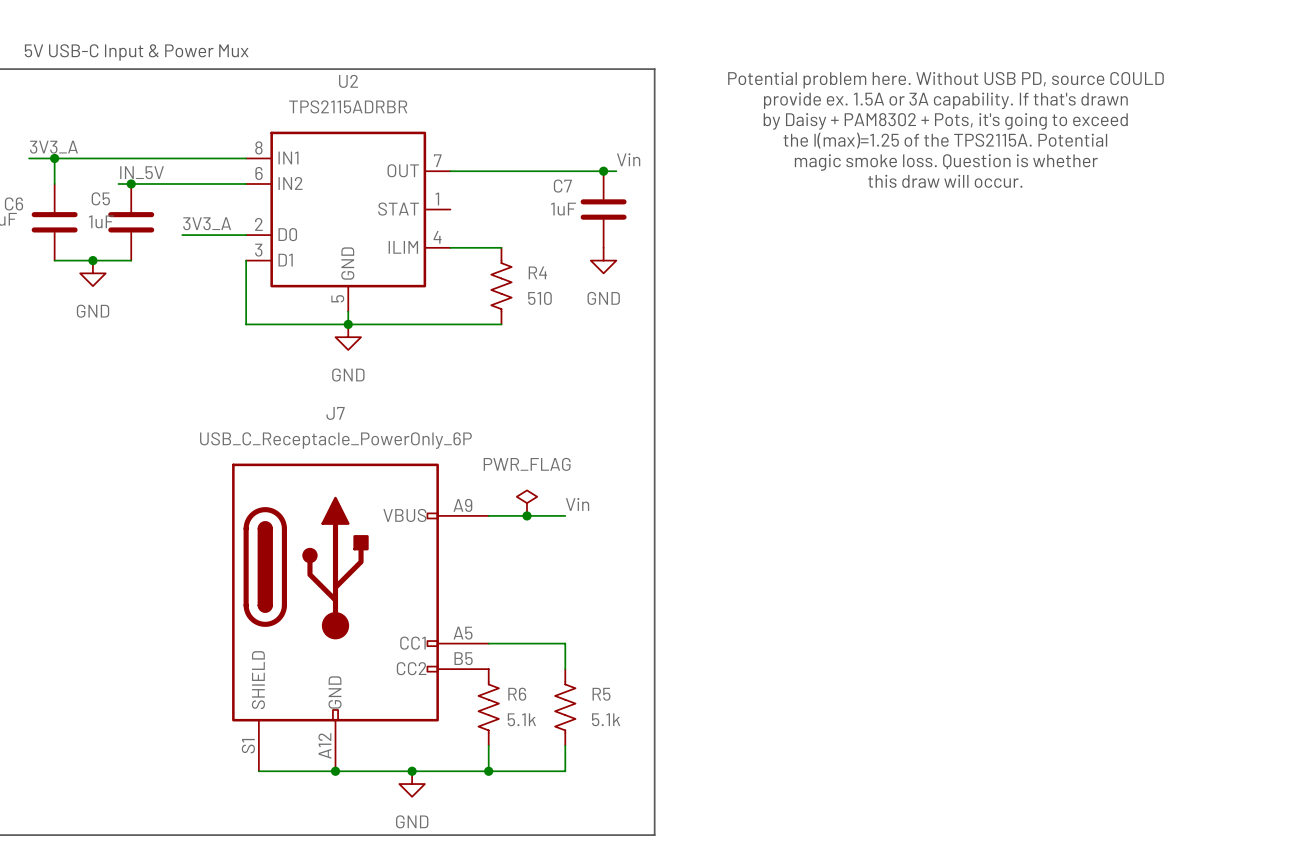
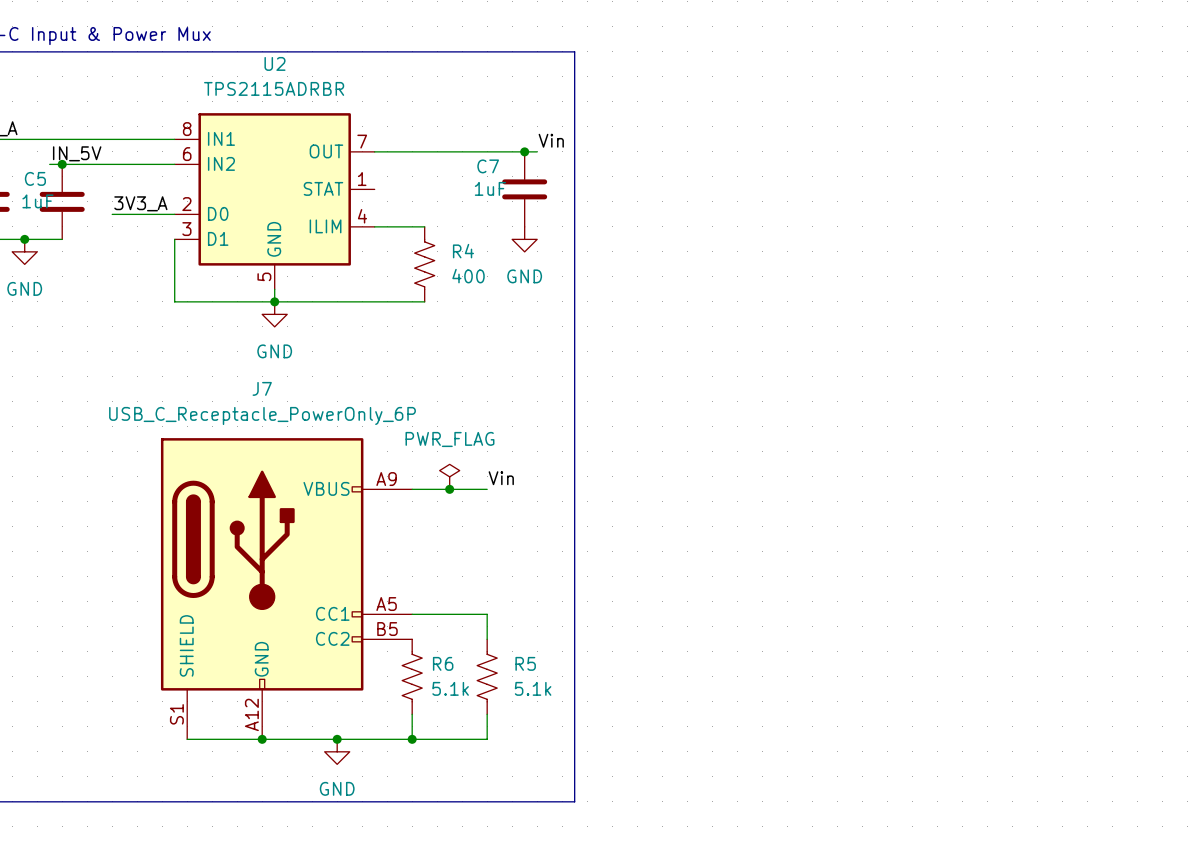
text: Potential problem here. Without USB PD, source COULD (945, 80) -> none
text: provide ex. 1.5A or 3A capability. If that's drawn (945, 100) -> none
text: by Daisy + PAM8302 + Pots, it's going to exceed (945, 121) -> none
text: the I(max)=1.25 of the TPS2115A. Potential (945, 140) -> none
text: magic smoke loss. Question is whether (946, 162) -> none
text: this draw will occur. (945, 181) -> none
R4 value: 510 (539, 298) -> 400 (468, 276)

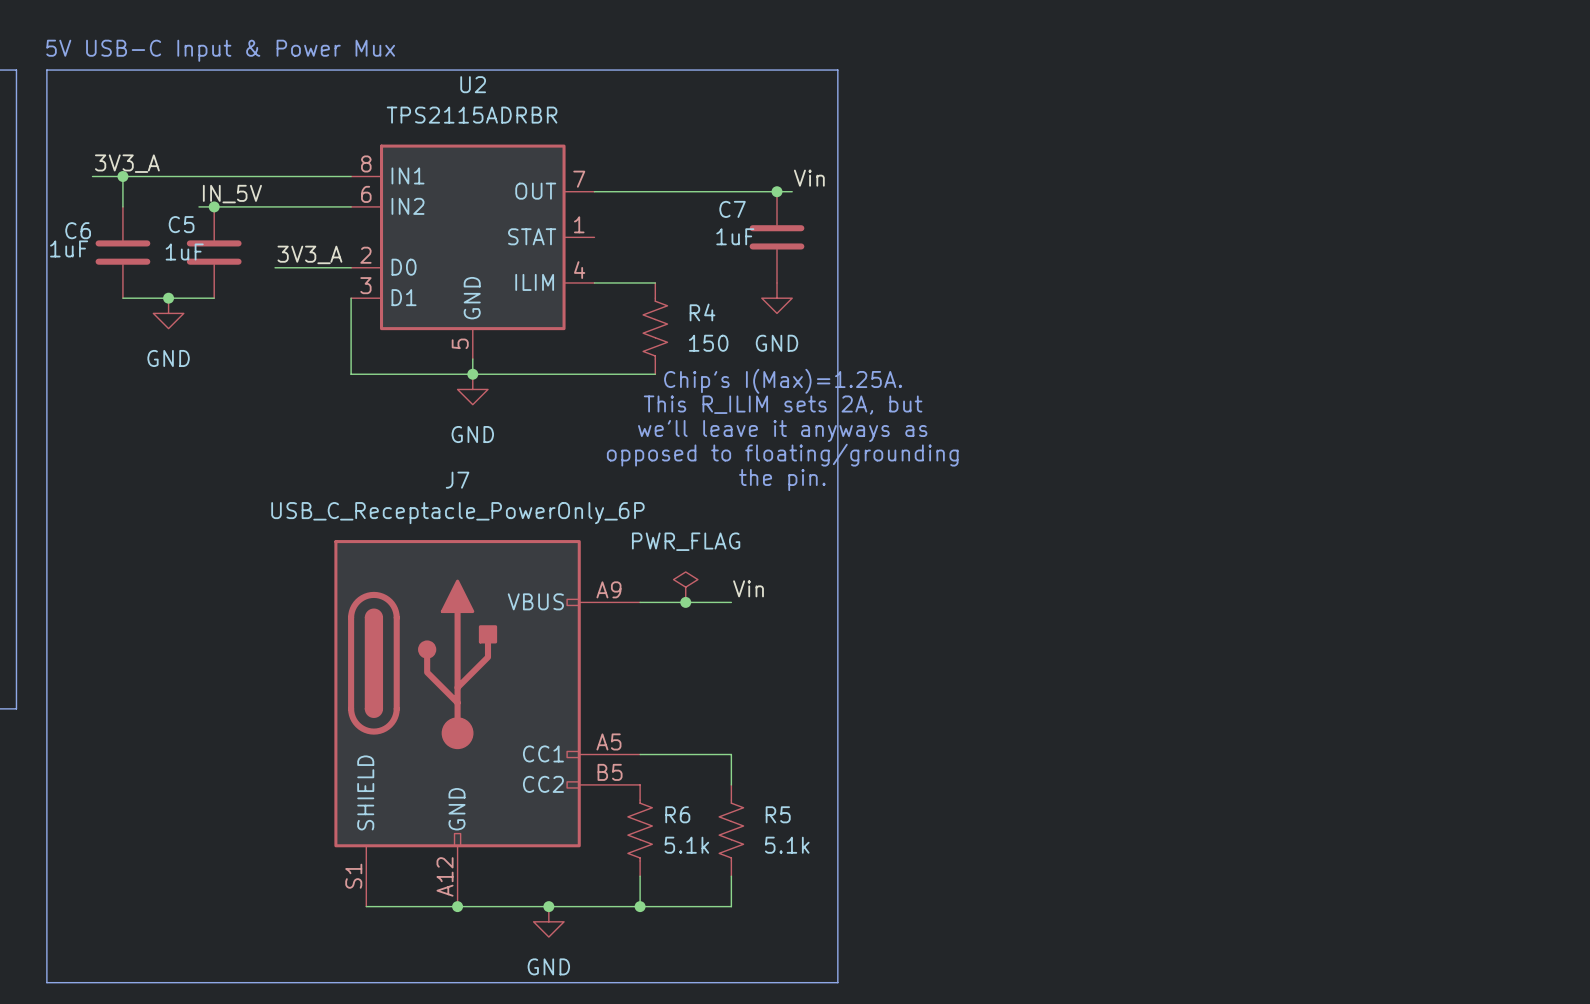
R4 value: 400 (468, 276) -> 150 (708, 343)
text: none -> Chip's I(Max)=1.25A. (783, 381)
text: none -> This R_ILIM sets 2A, but (783, 405)
text: none -> we'll leave it anyways as (782, 431)
text: none -> opposed to floating/grounding (782, 455)
text: none -> the pin. (782, 480)

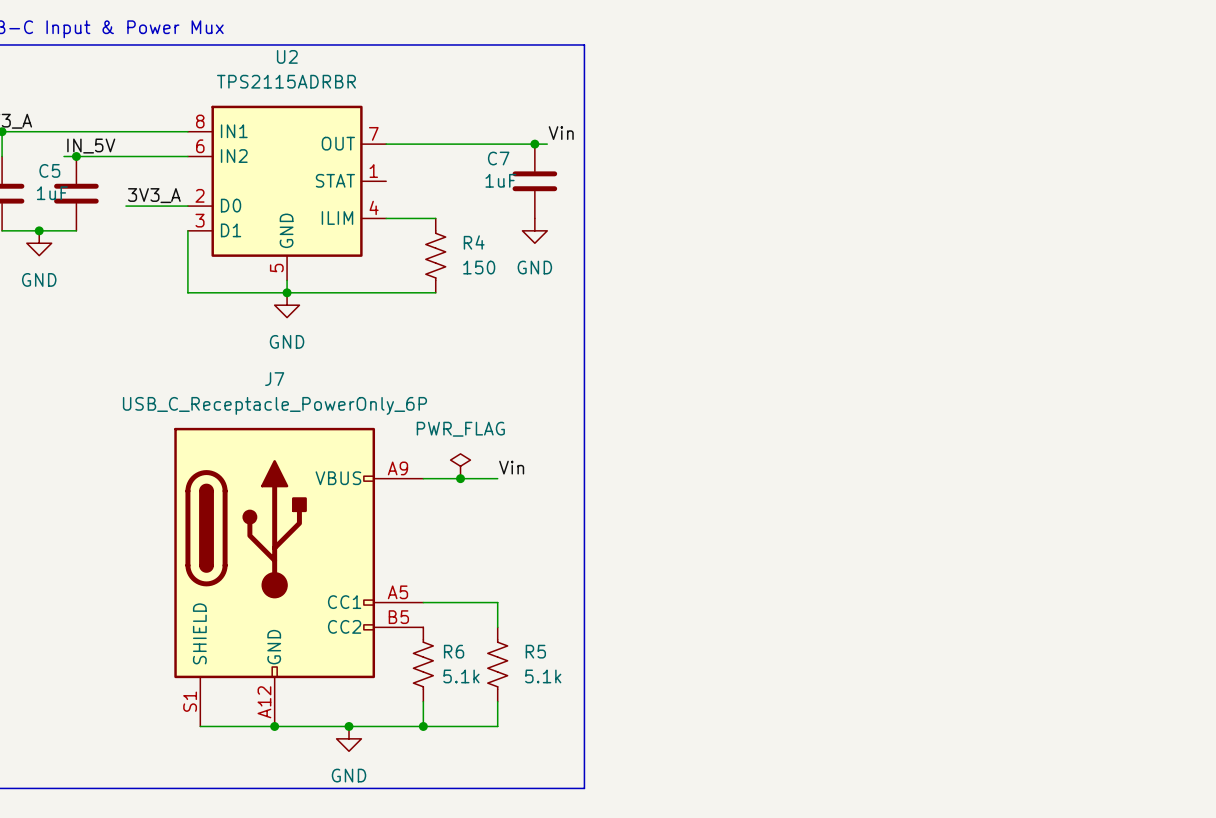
text: Chip's I(Max)=1.25A. (783, 381) -> none
text: This R_ILIM sets 2A, but (783, 405) -> none
text: we'll leave it anyways as (782, 431) -> none
text: opposed to floating/grounding (782, 455) -> none
text: the pin. (782, 480) -> none

